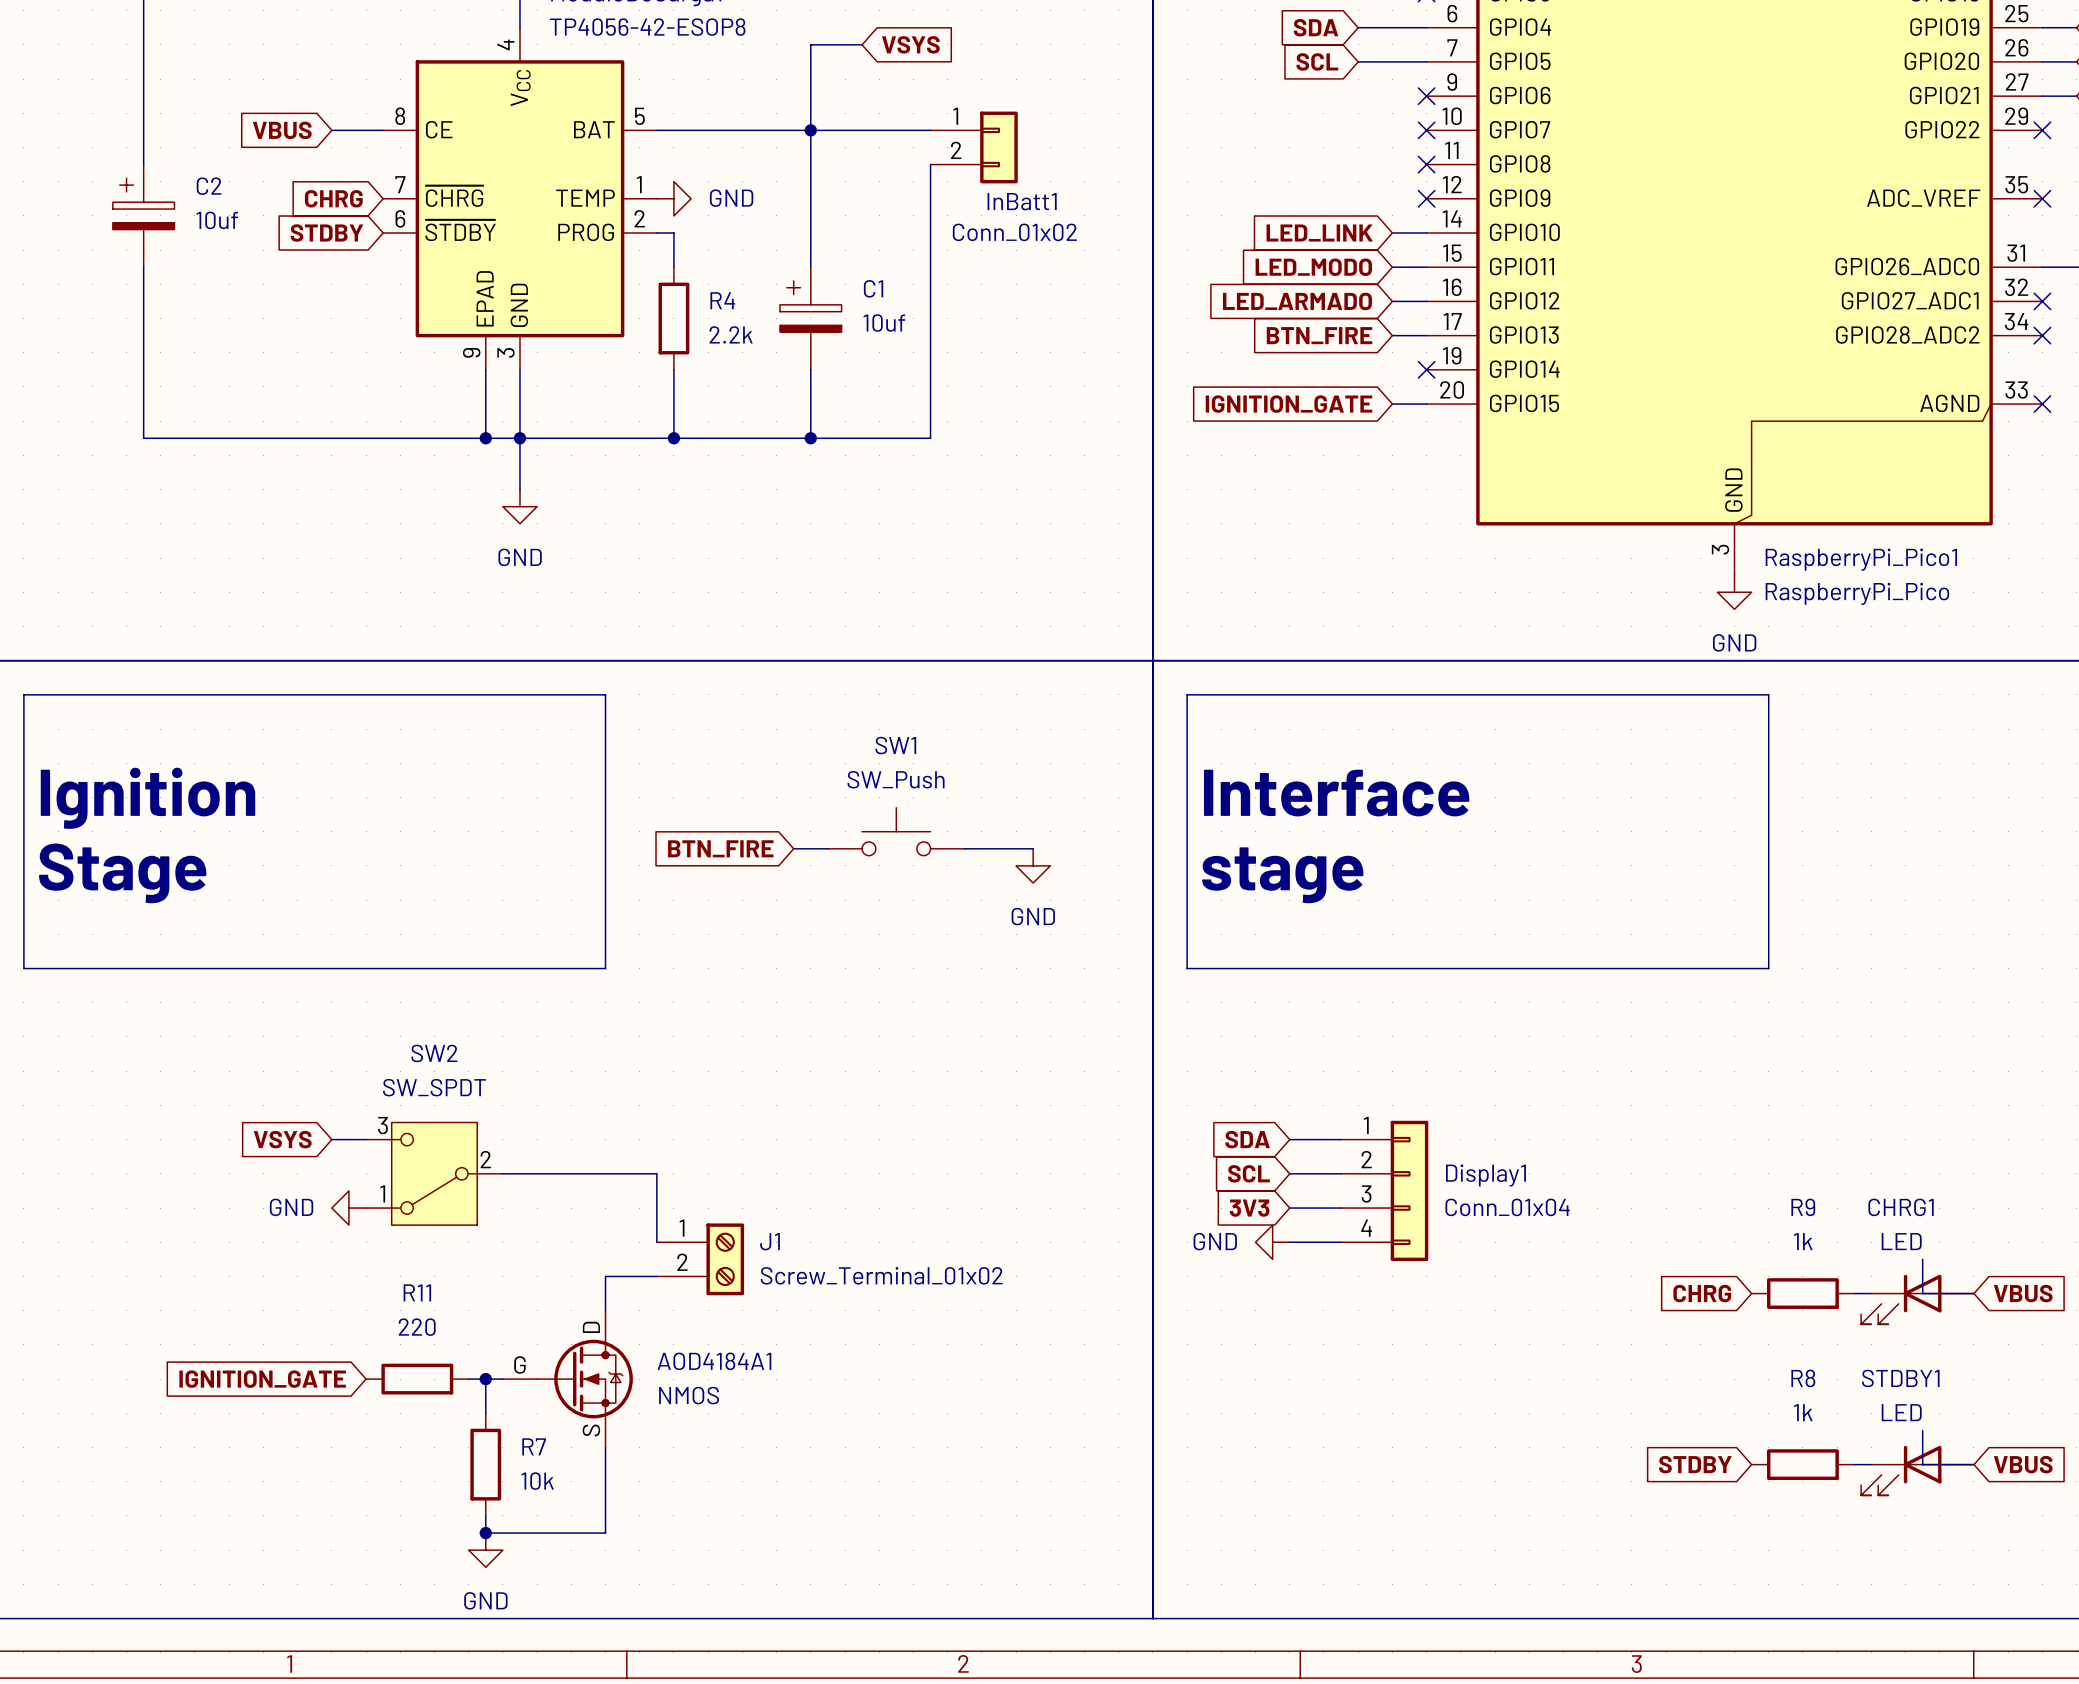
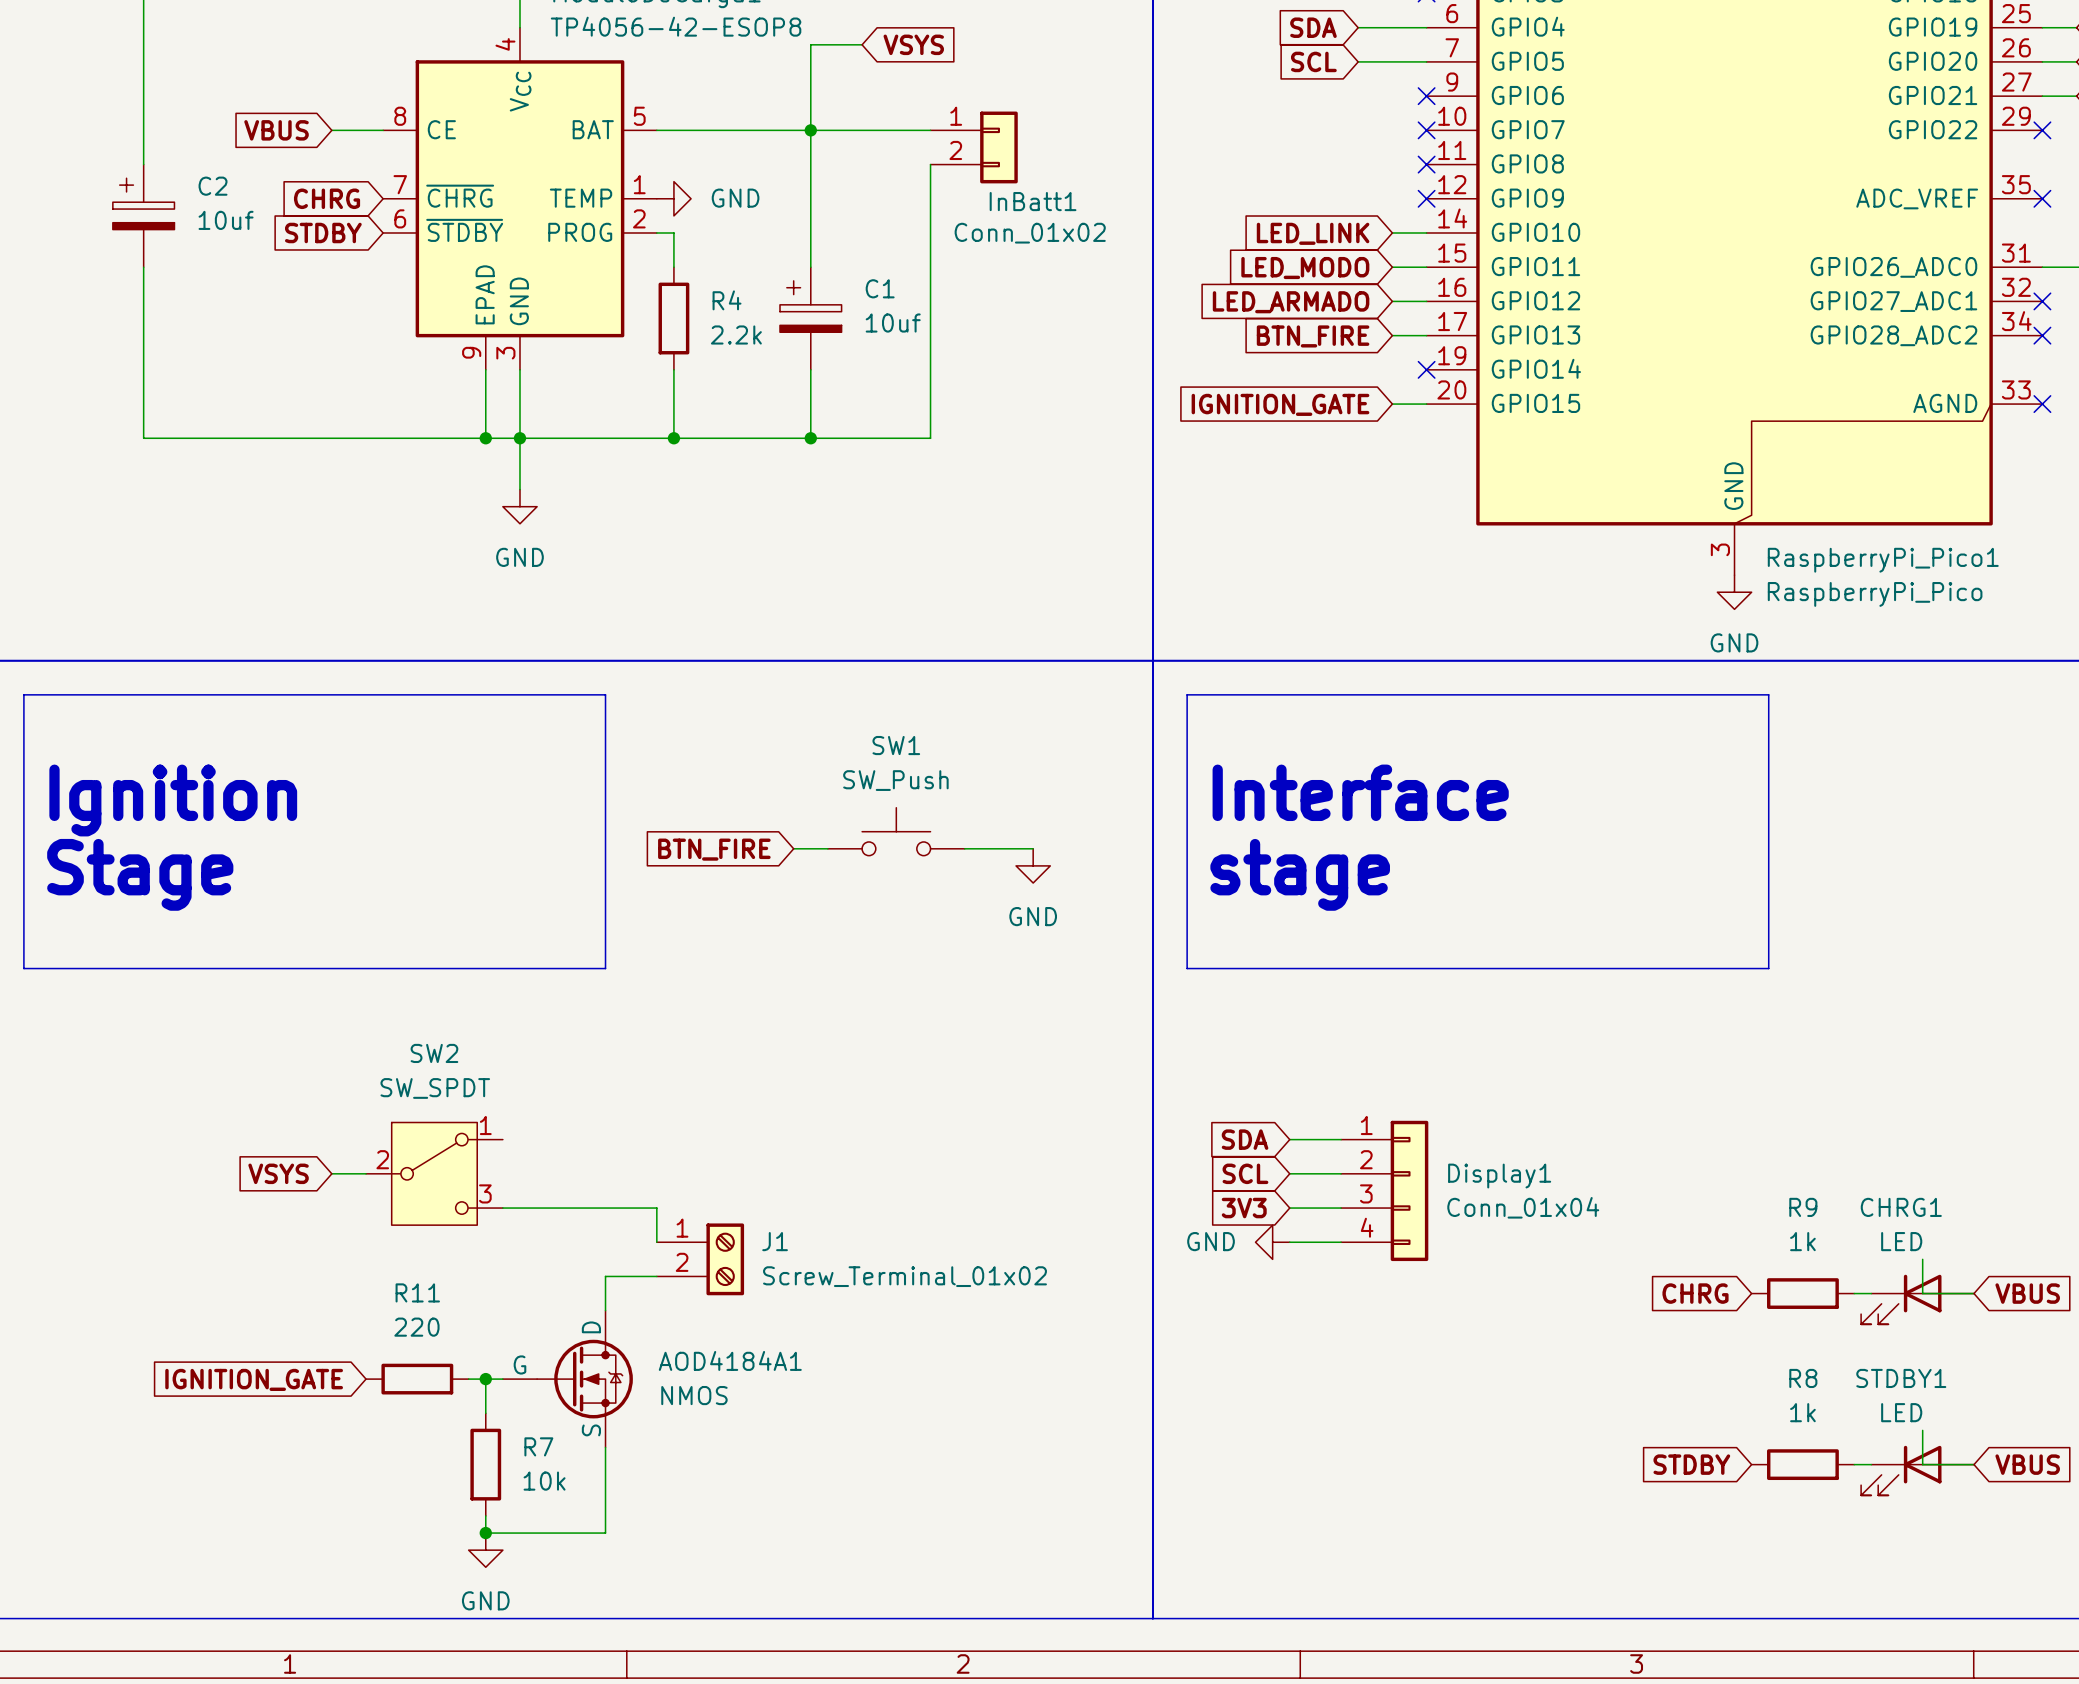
global label position: VSYS (282, 1139) -> VSYS (278, 1173)
wire: (331, 1139) (366, 1139) -> (331, 1173) (366, 1173)
SW2 rotation: 0° (434, 1173) -> 180° (434, 1173)
wire: (502, 1173) (656, 1173) (656, 1208) -> (502, 1208) (656, 1208)
power symbol: GND (348, 1208) -> none

